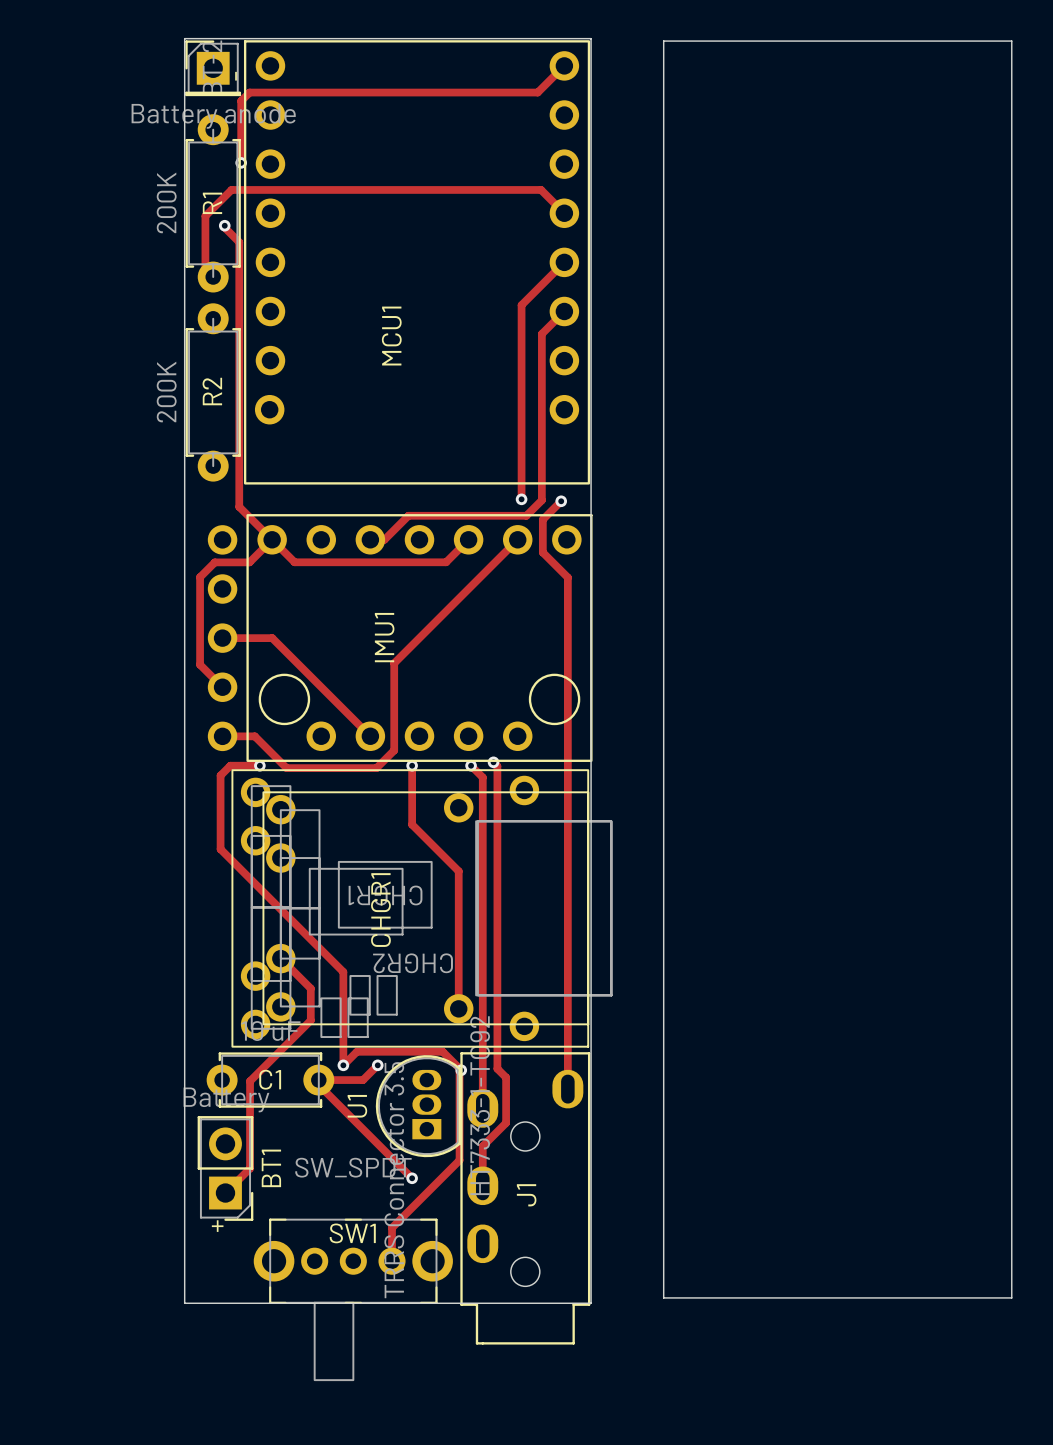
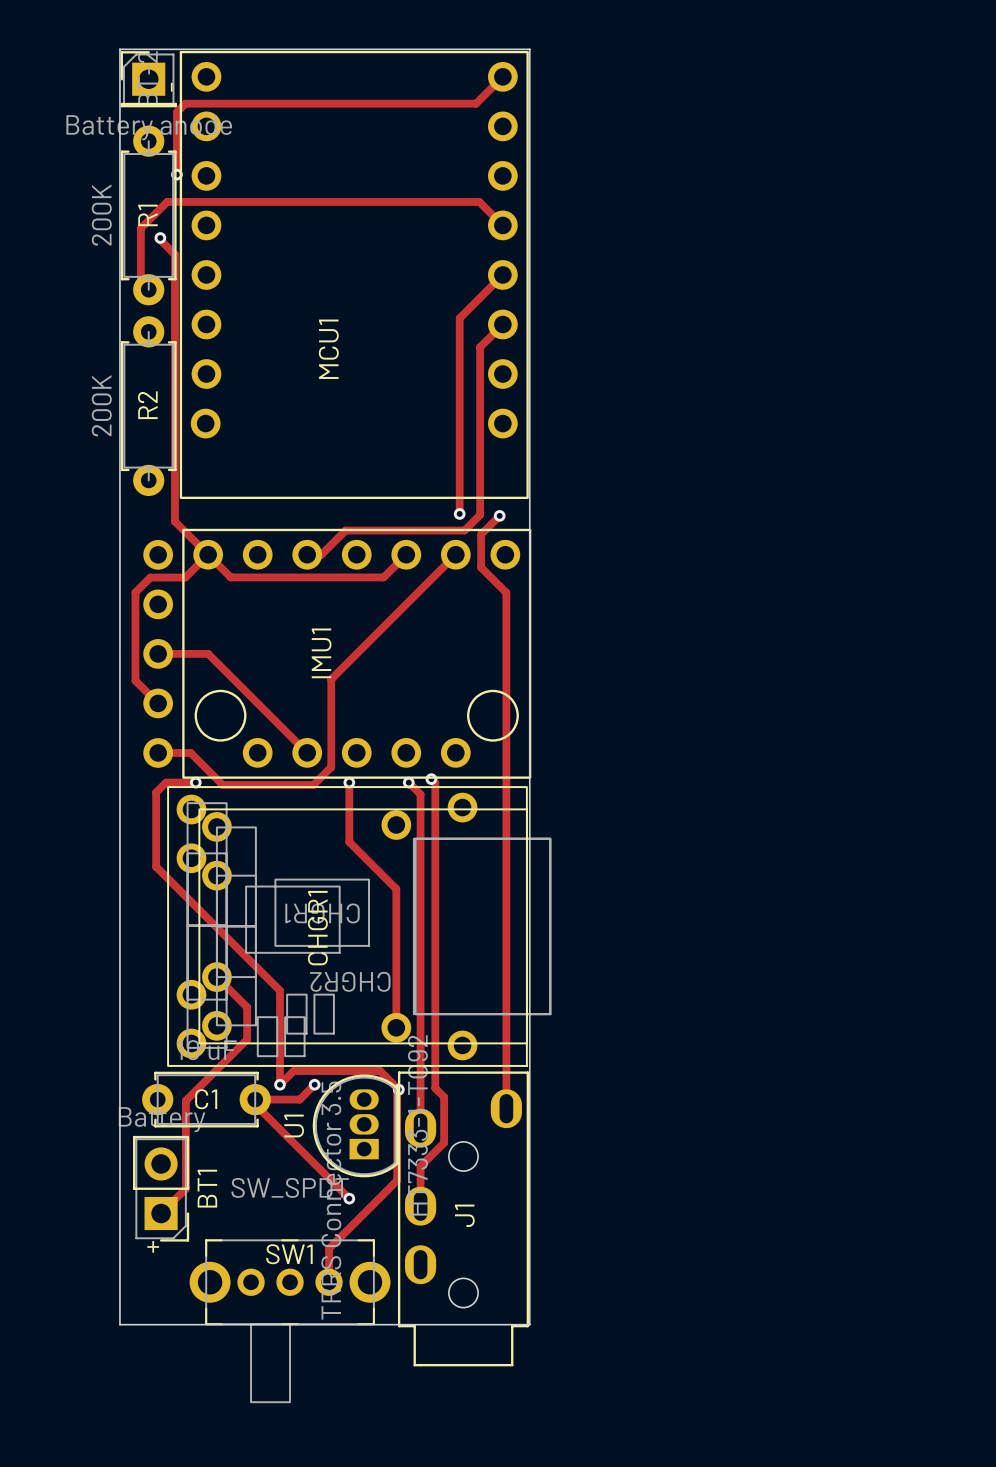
board edge: (663, 41) (1011, 41) (1011, 1297) (663, 1297) (663, 41) -> none

